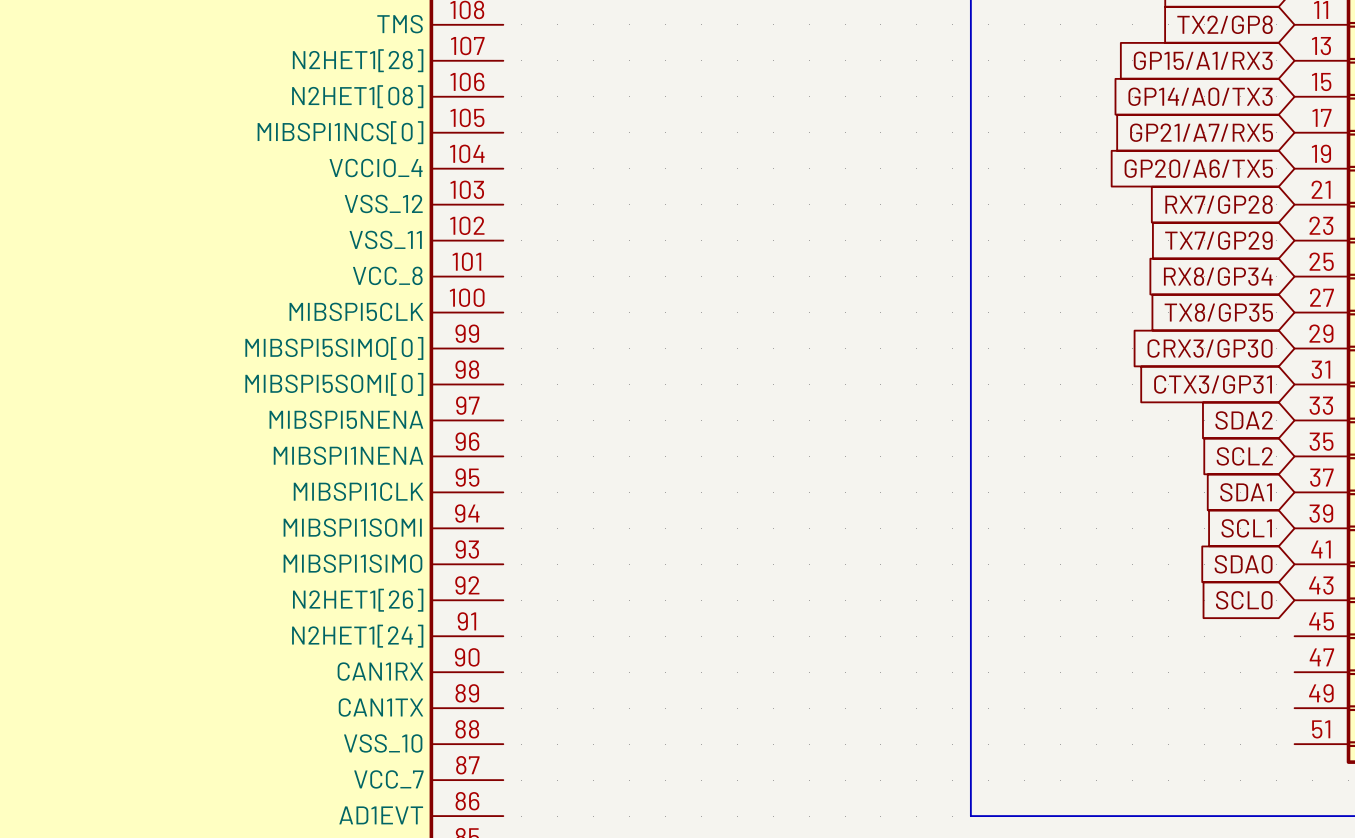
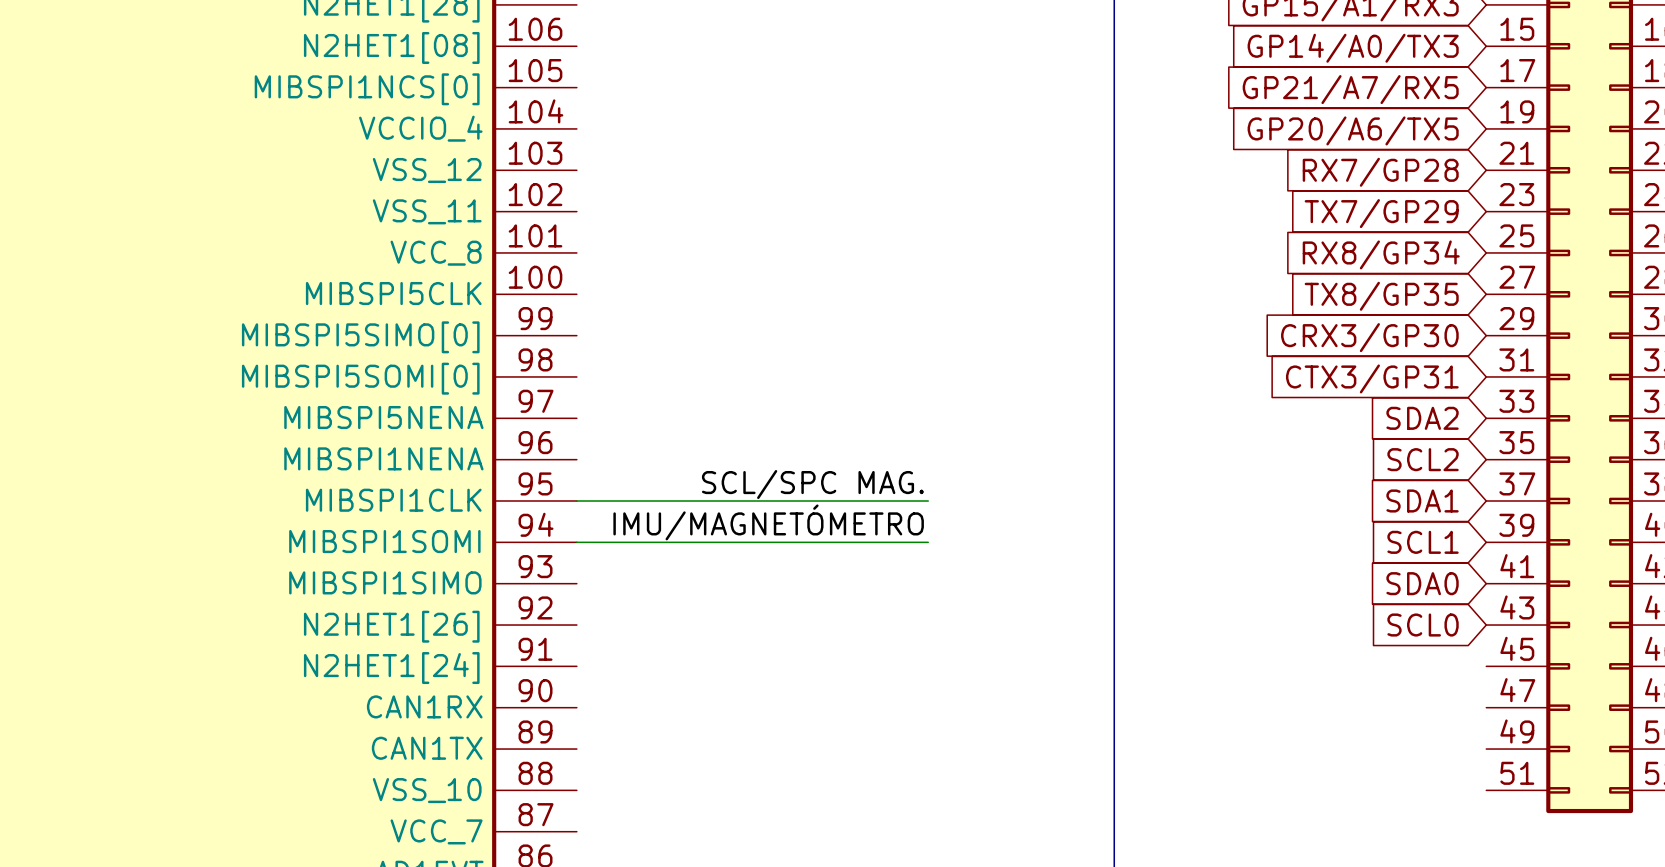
label: none -> SCL/SPC MAG. (812, 484)
wire: none -> (576, 501) (928, 501)
label: none -> IMU/MAGNETÓMETRO (768, 522)
wire: none -> (576, 542) (928, 542)

